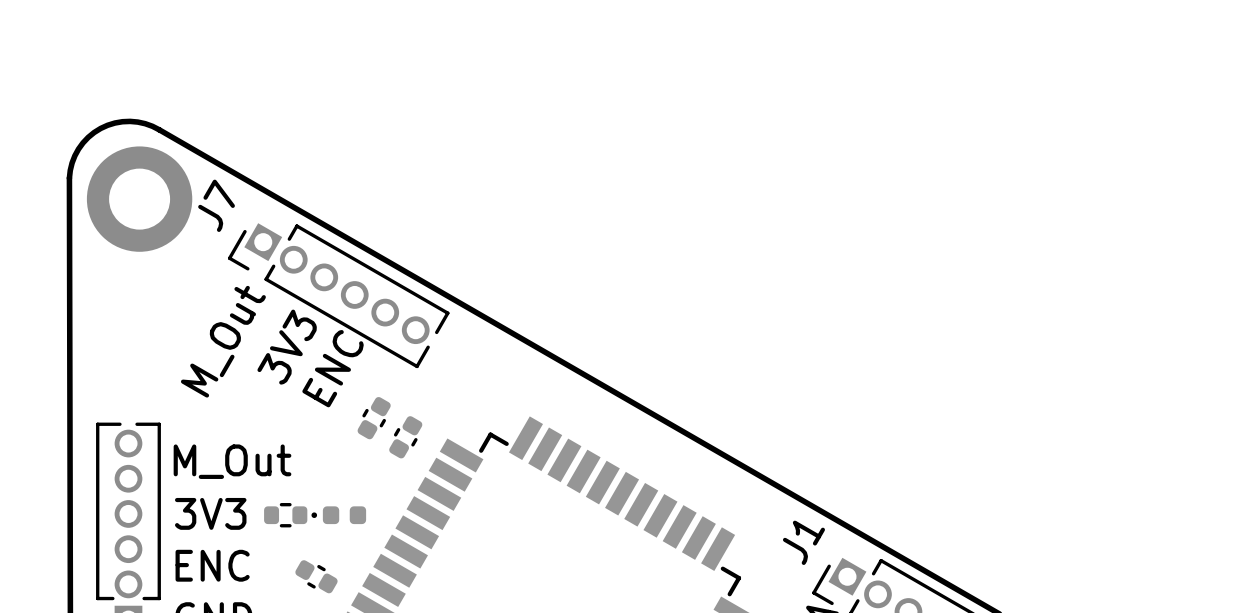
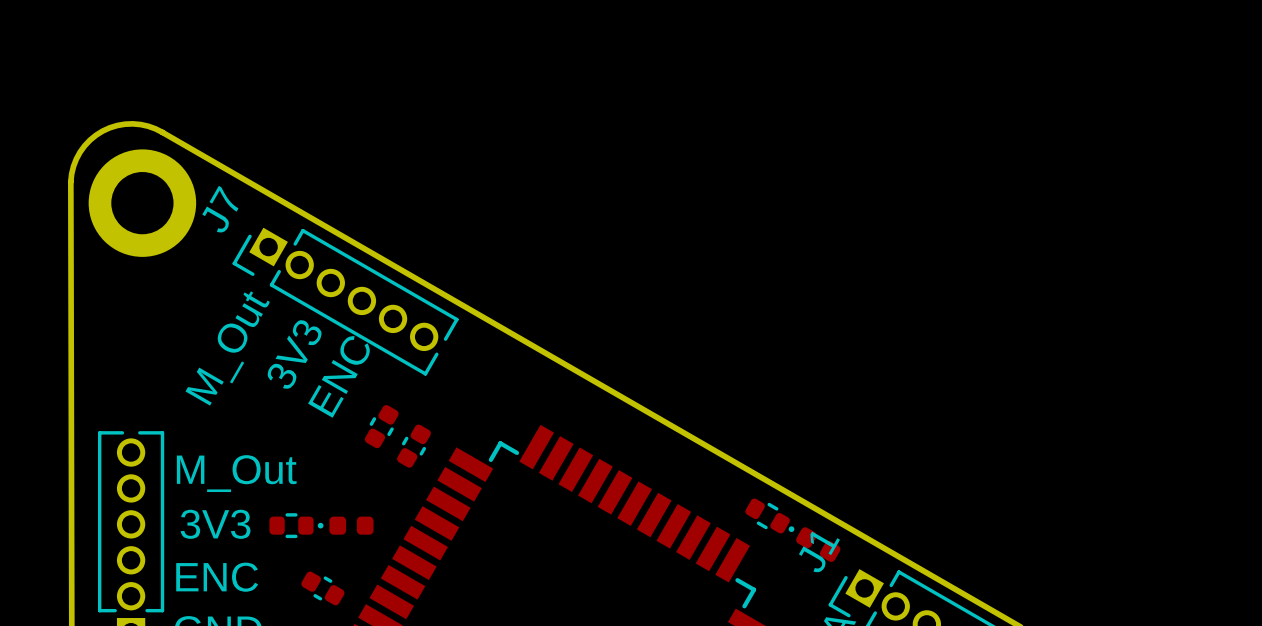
part: none -> (767, 516)
part: none -> (814, 544)

